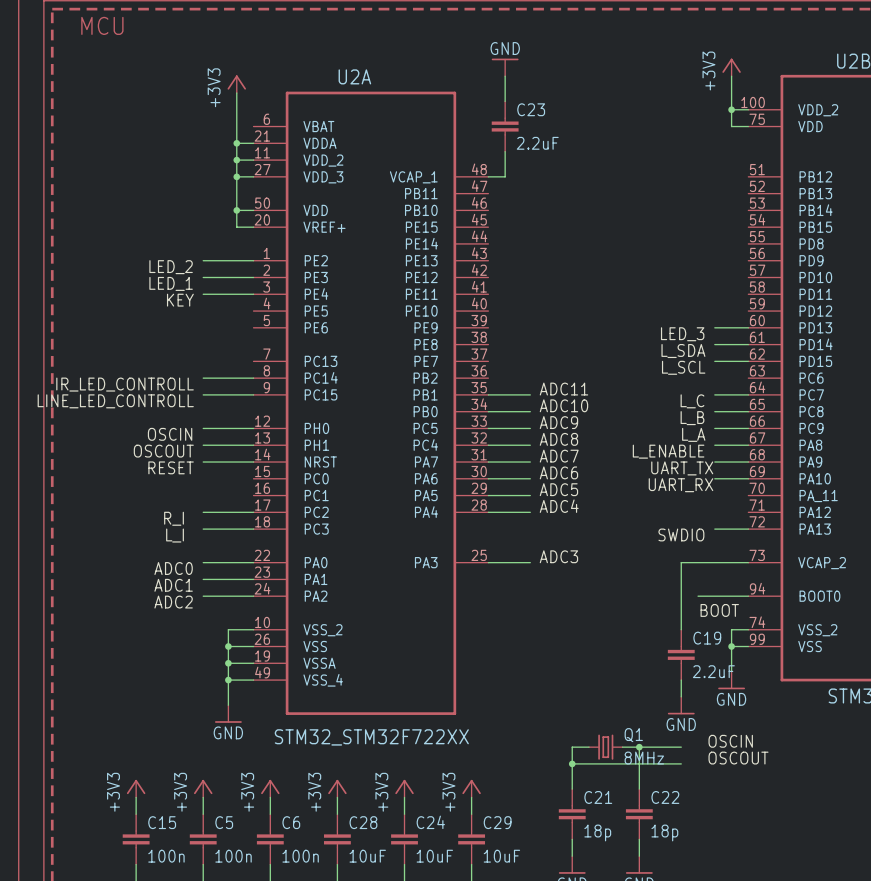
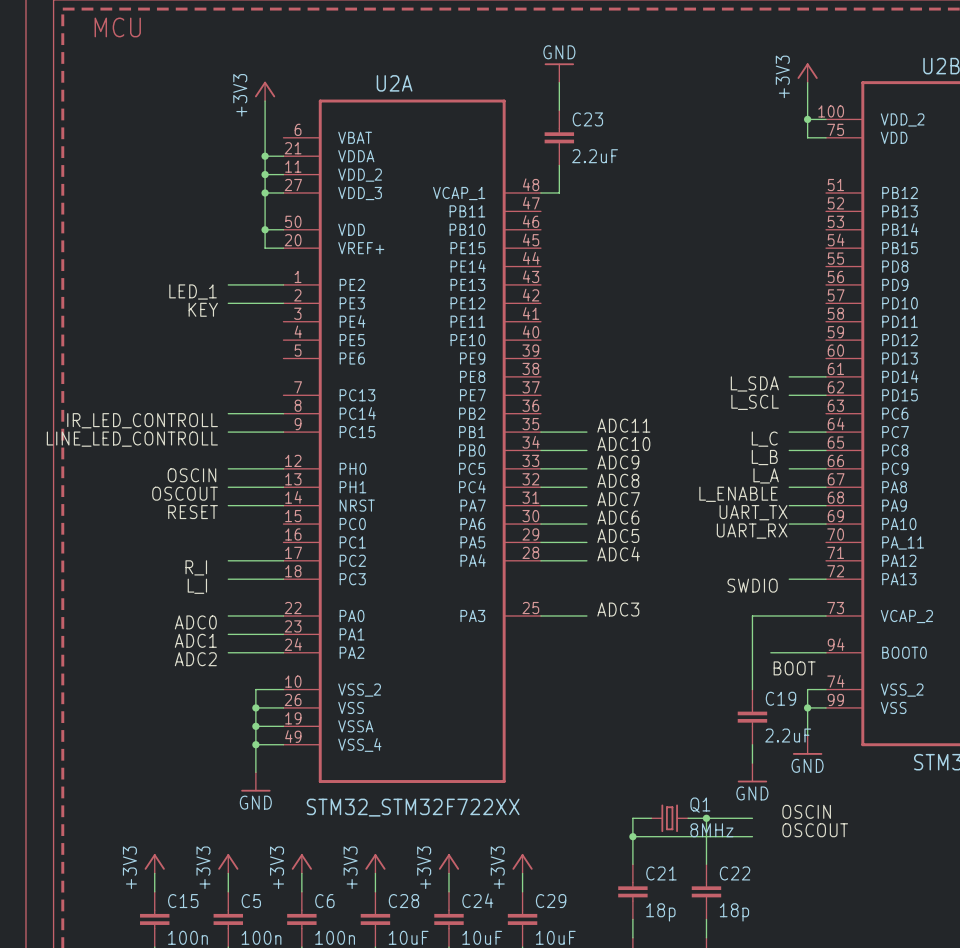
label: LED_2 (171, 267) -> LED_1 (193, 291)
label: LED_1 (171, 283) -> KEY (203, 309)
wire: (203, 294) (253, 294) -> none
label: KEY (180, 300) -> none
wire: (714, 327) (748, 327) -> none
label: LED_3 (682, 334) -> none

